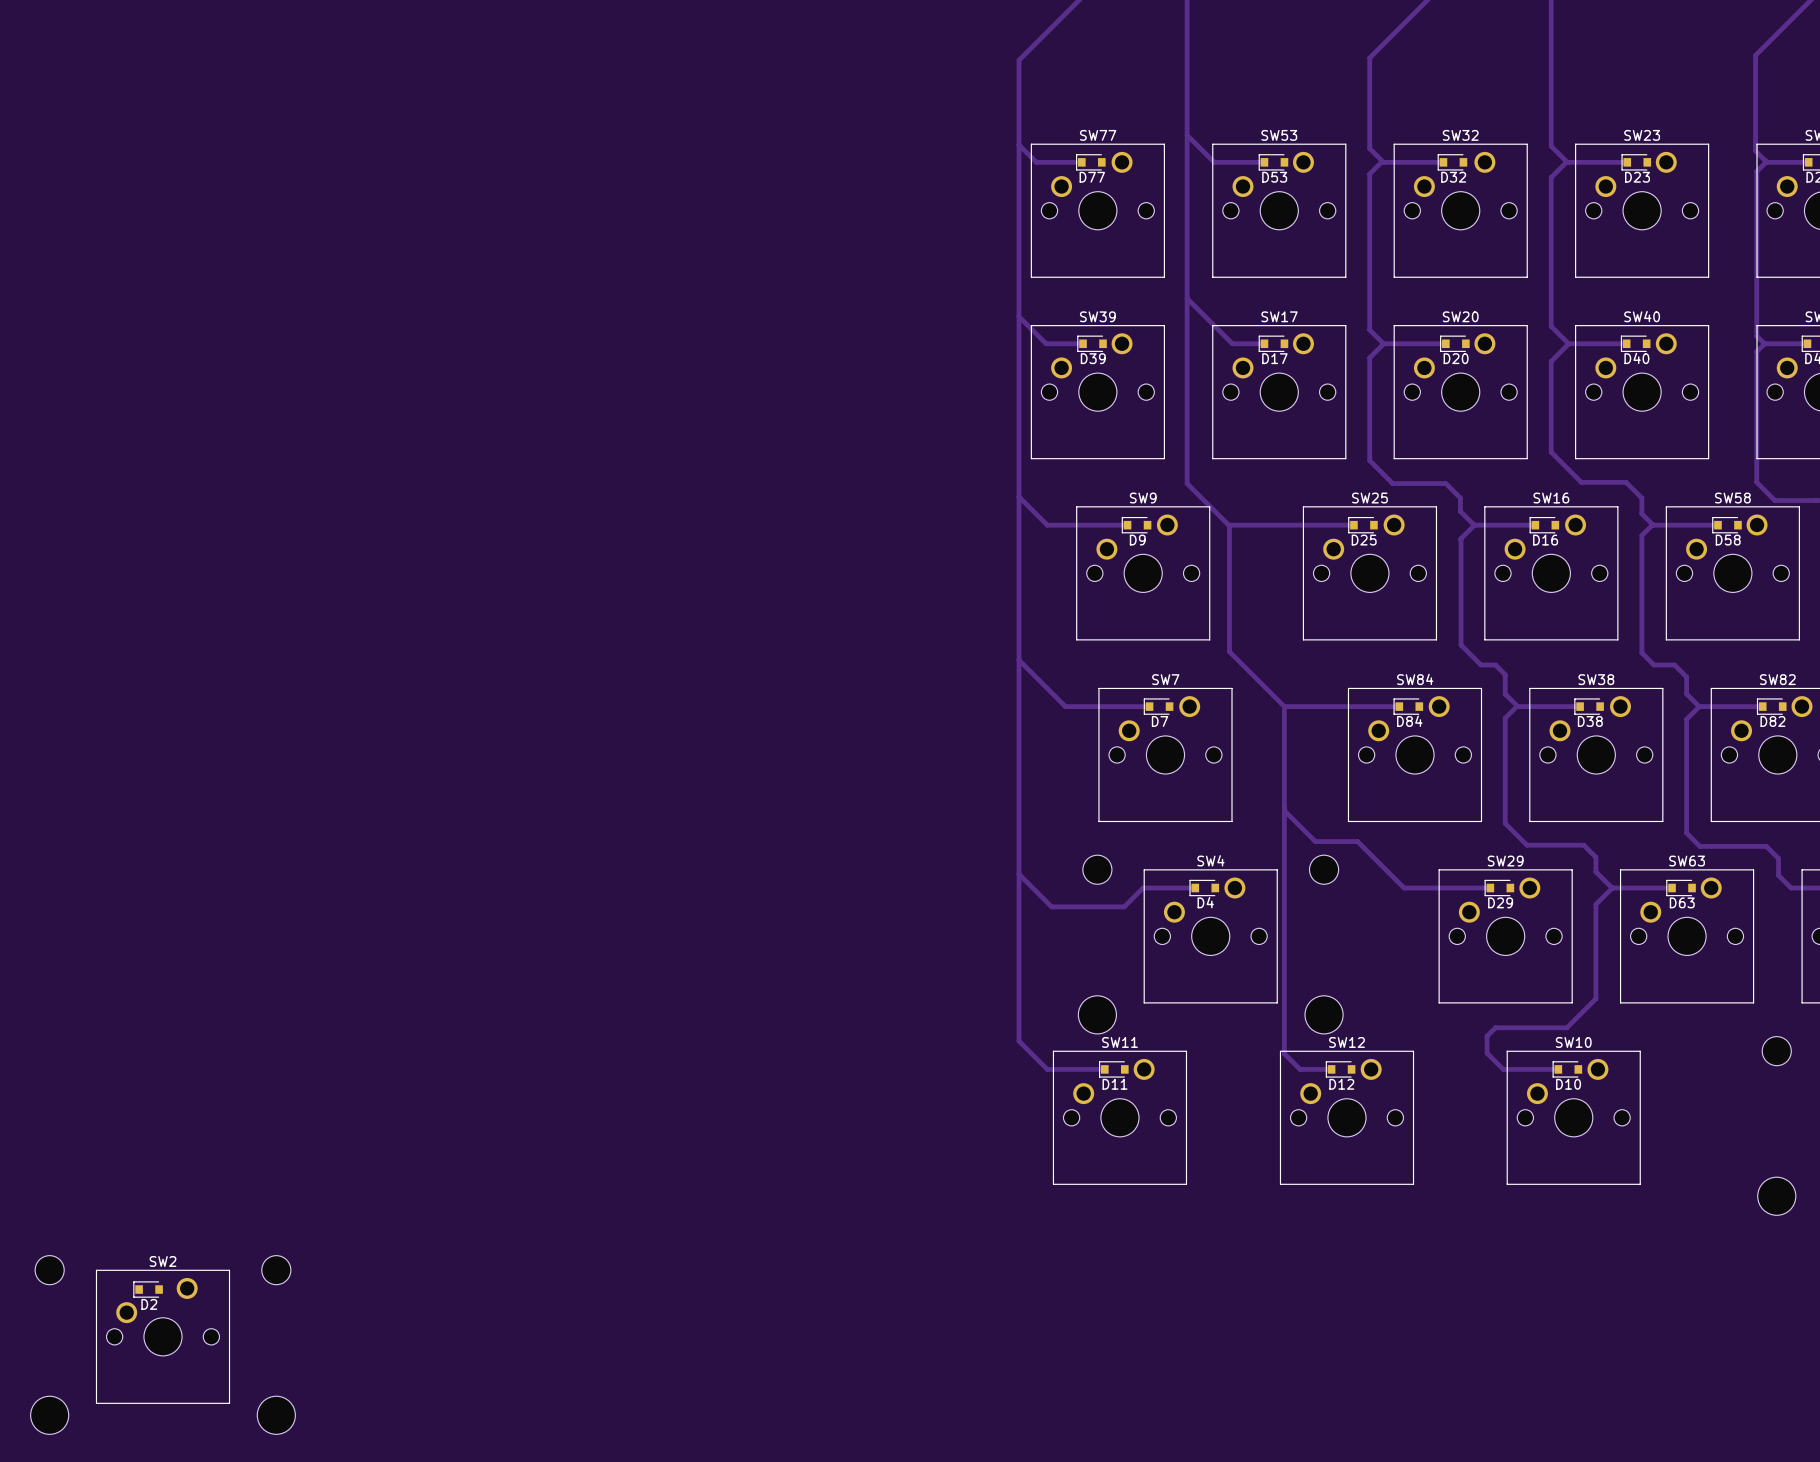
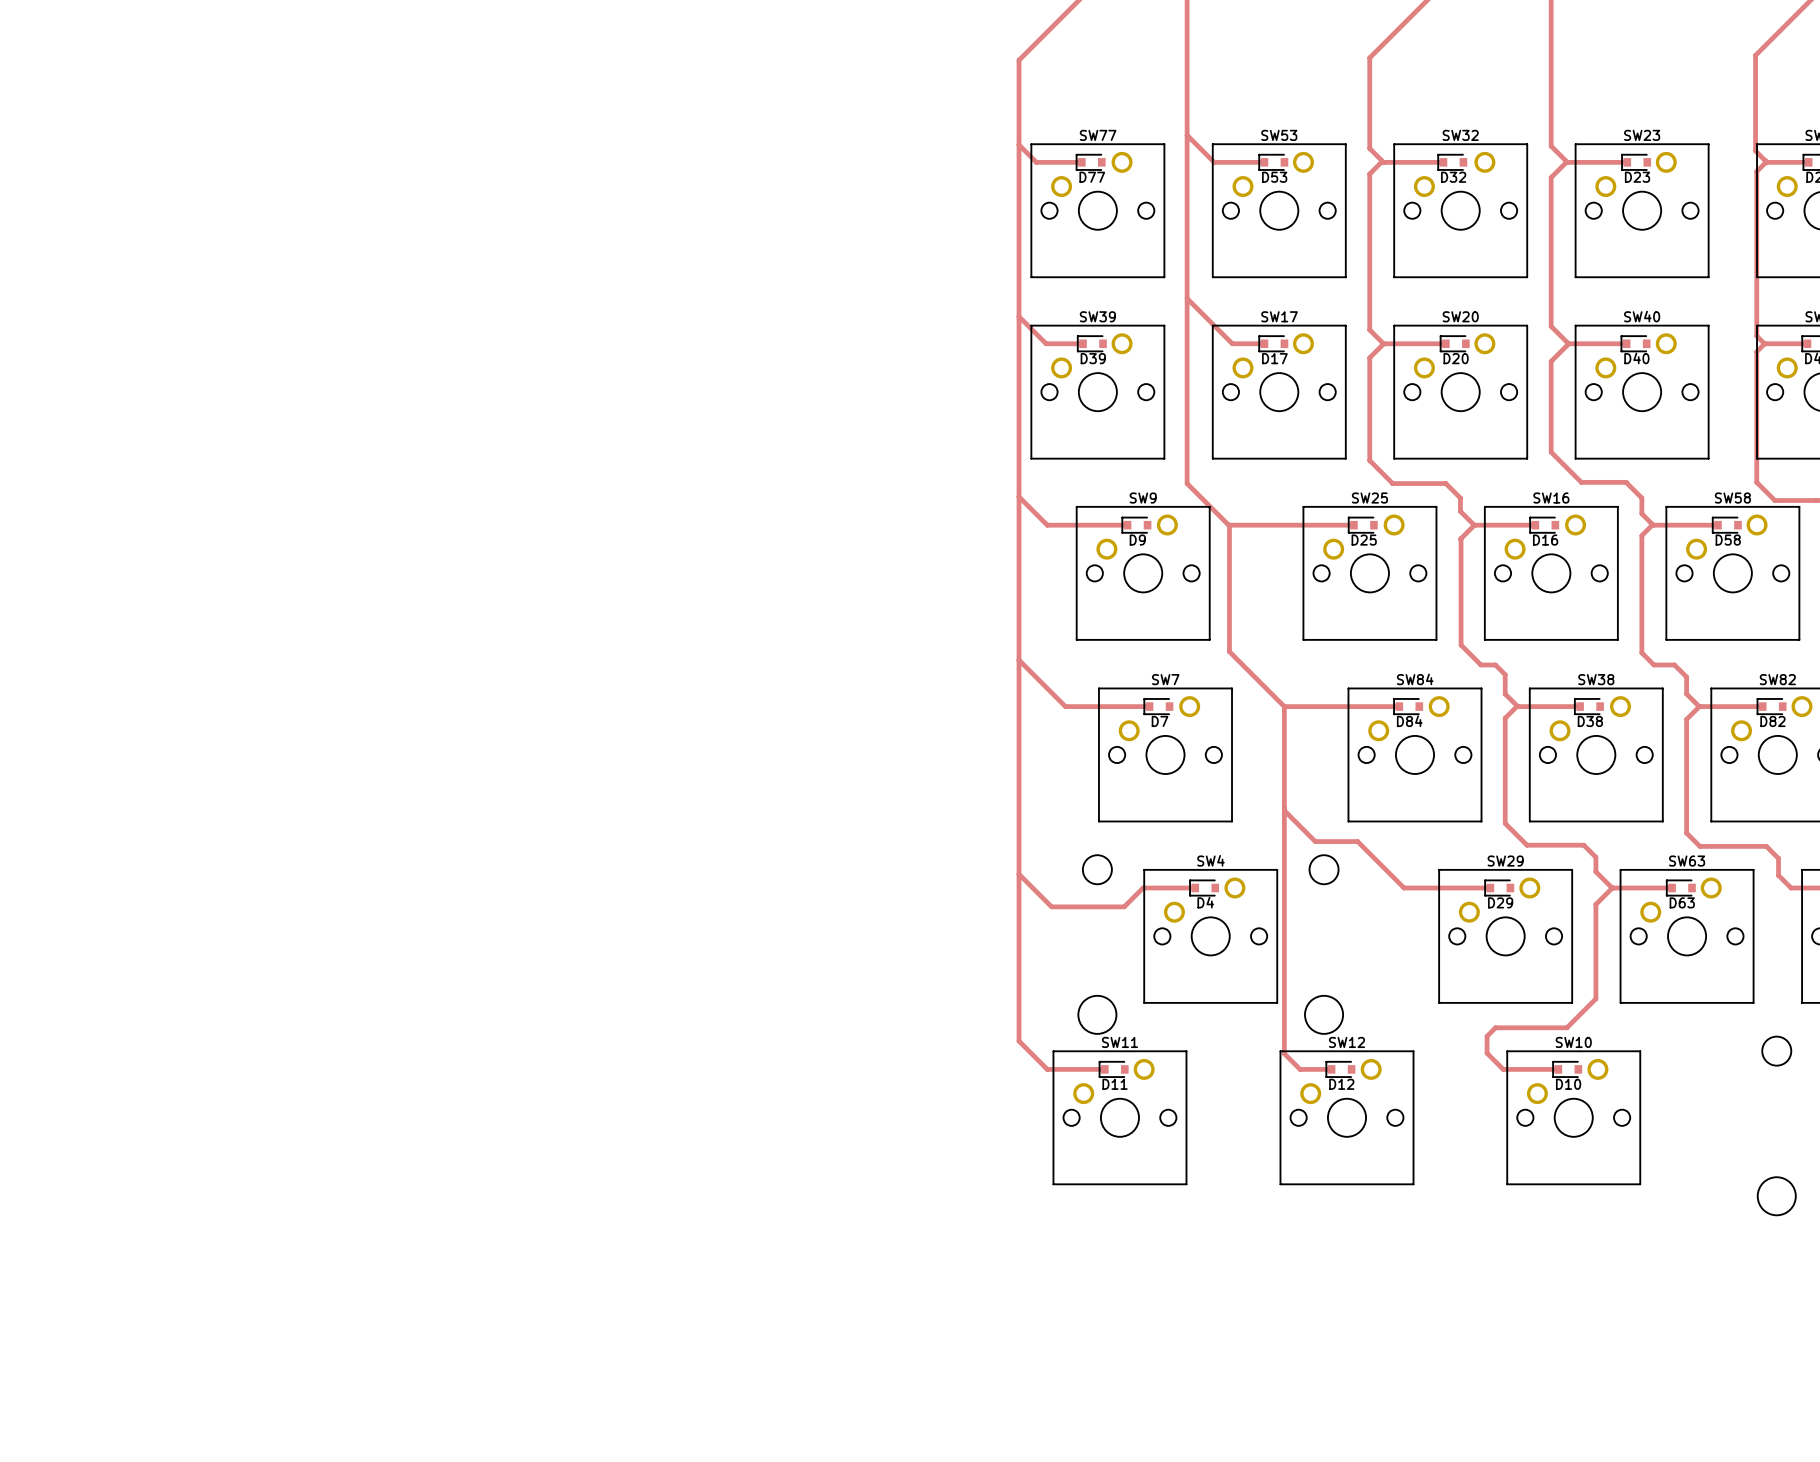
D2: (148, 1289) -> none
SW2: (163, 1344) -> none

